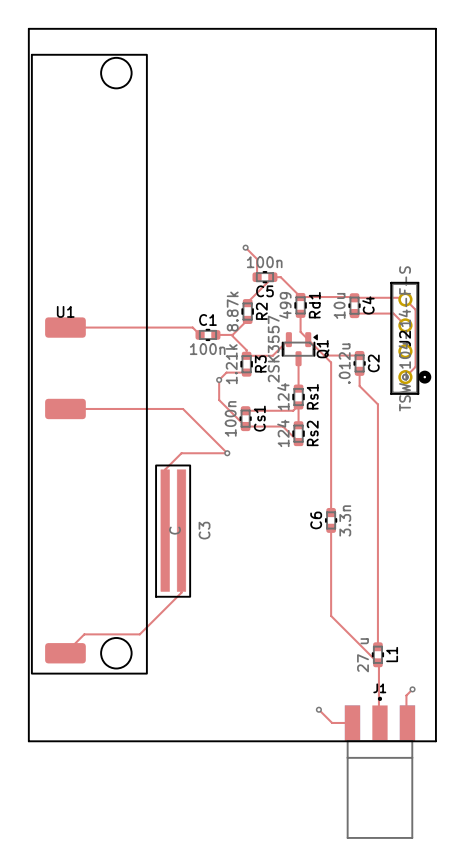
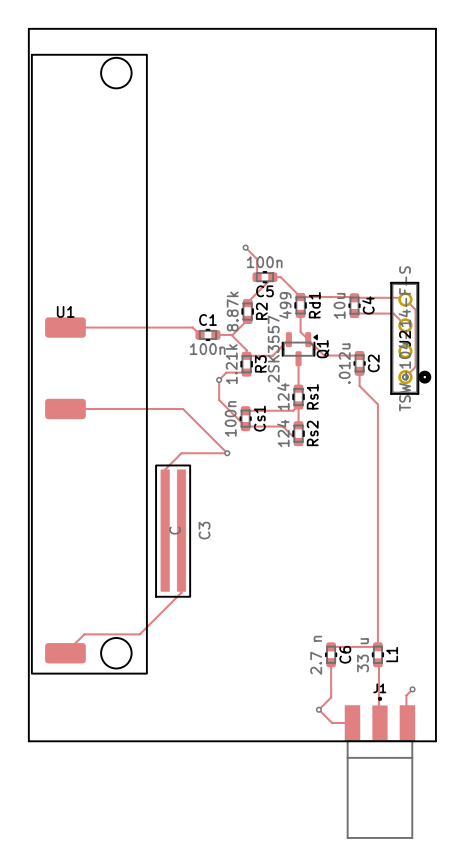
top track: (324, 355) (331, 362) (331, 512) -> none
C6 name position: C6 (316, 520) -> C6 (345, 654)
C6 position: (331, 520) -> (331, 654)
C6 value: 3.3n (345, 520) -> 2.7 n (316, 655)
top track: (331, 528) (331, 615) (377, 662) -> none
top track: none -> (331, 646) (377, 646)
L1 value: 27 u (363, 655) -> 33 u (363, 655)
top track: none -> (331, 662) (331, 697) (318, 709)

